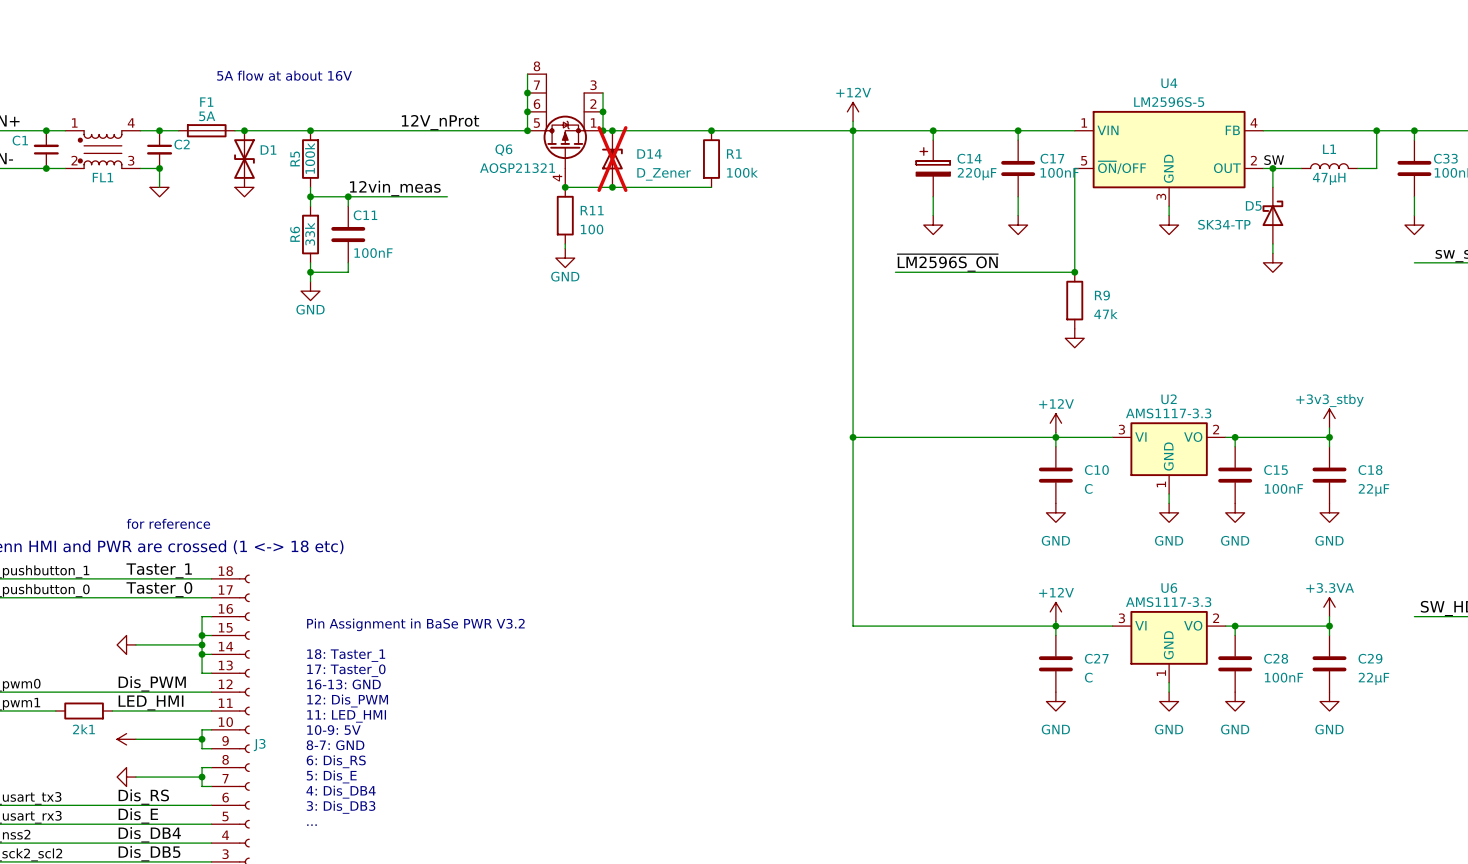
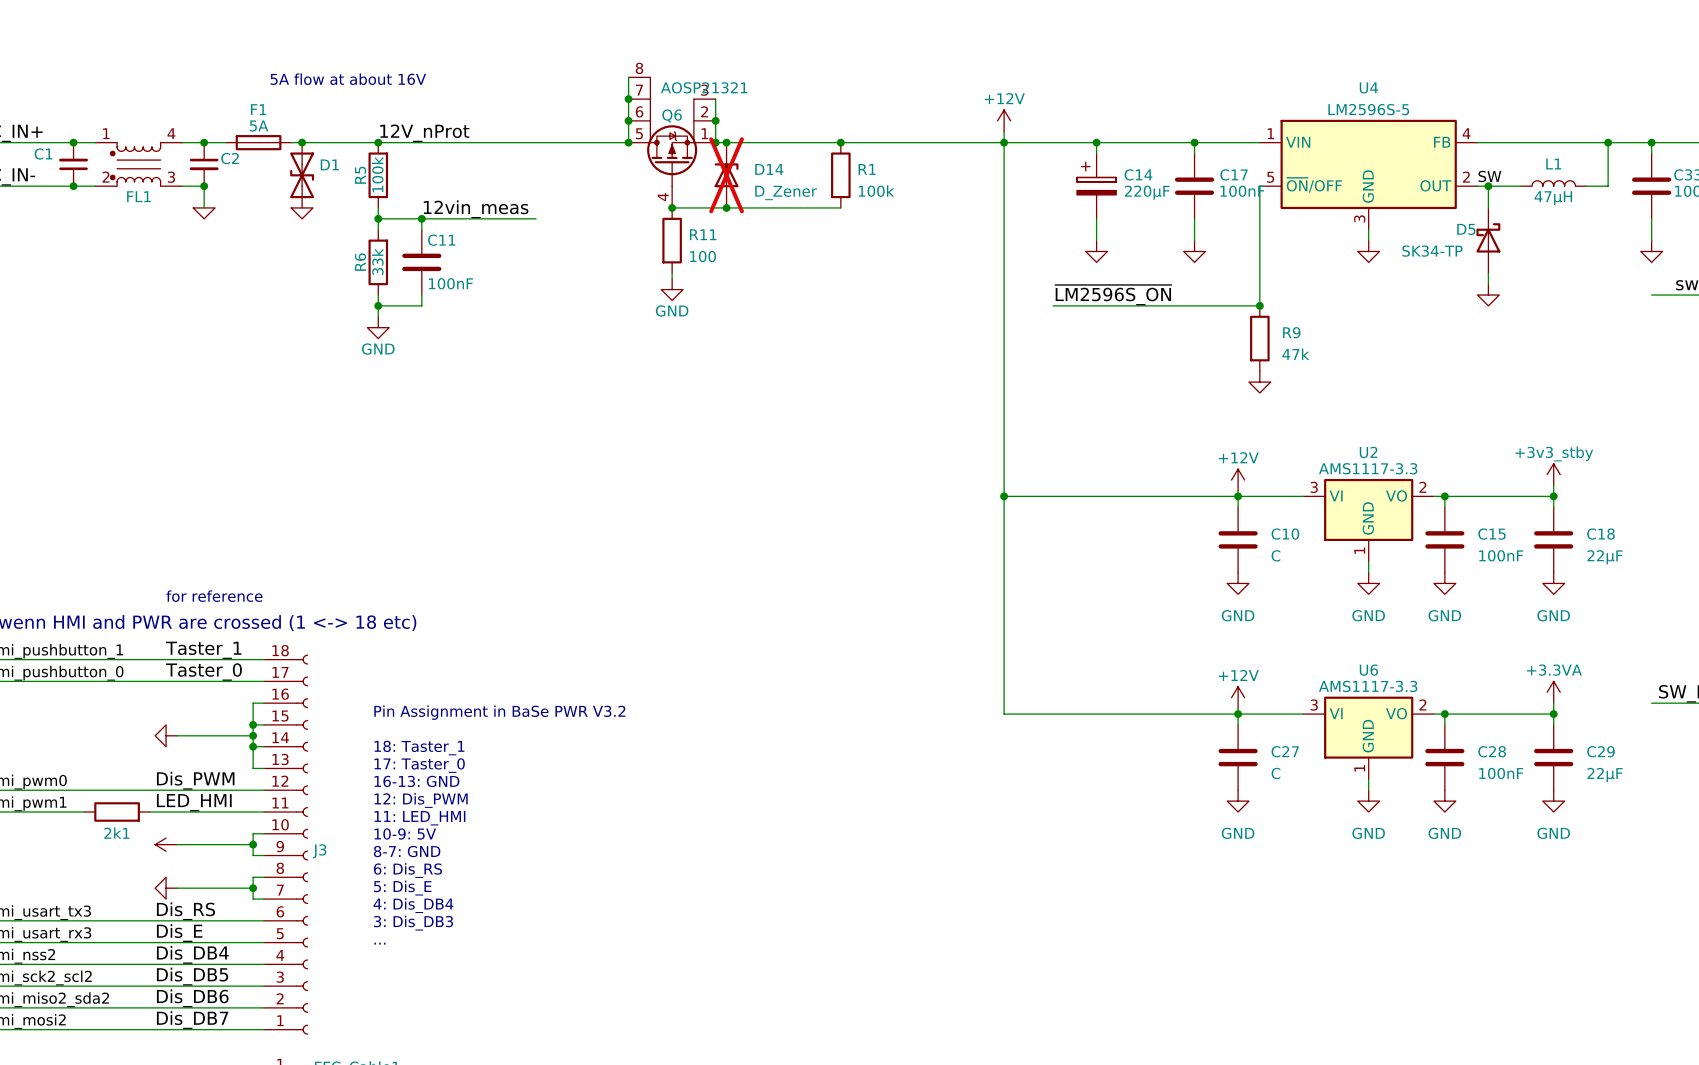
label position: 12V_nProt (440, 122) -> 12V_nProt (424, 133)
Q6 name position: Q6 (503, 150) -> Q6 (672, 115)
Q6 value position: AOSP21321 (517, 168) -> AOSP21321 (704, 87)

